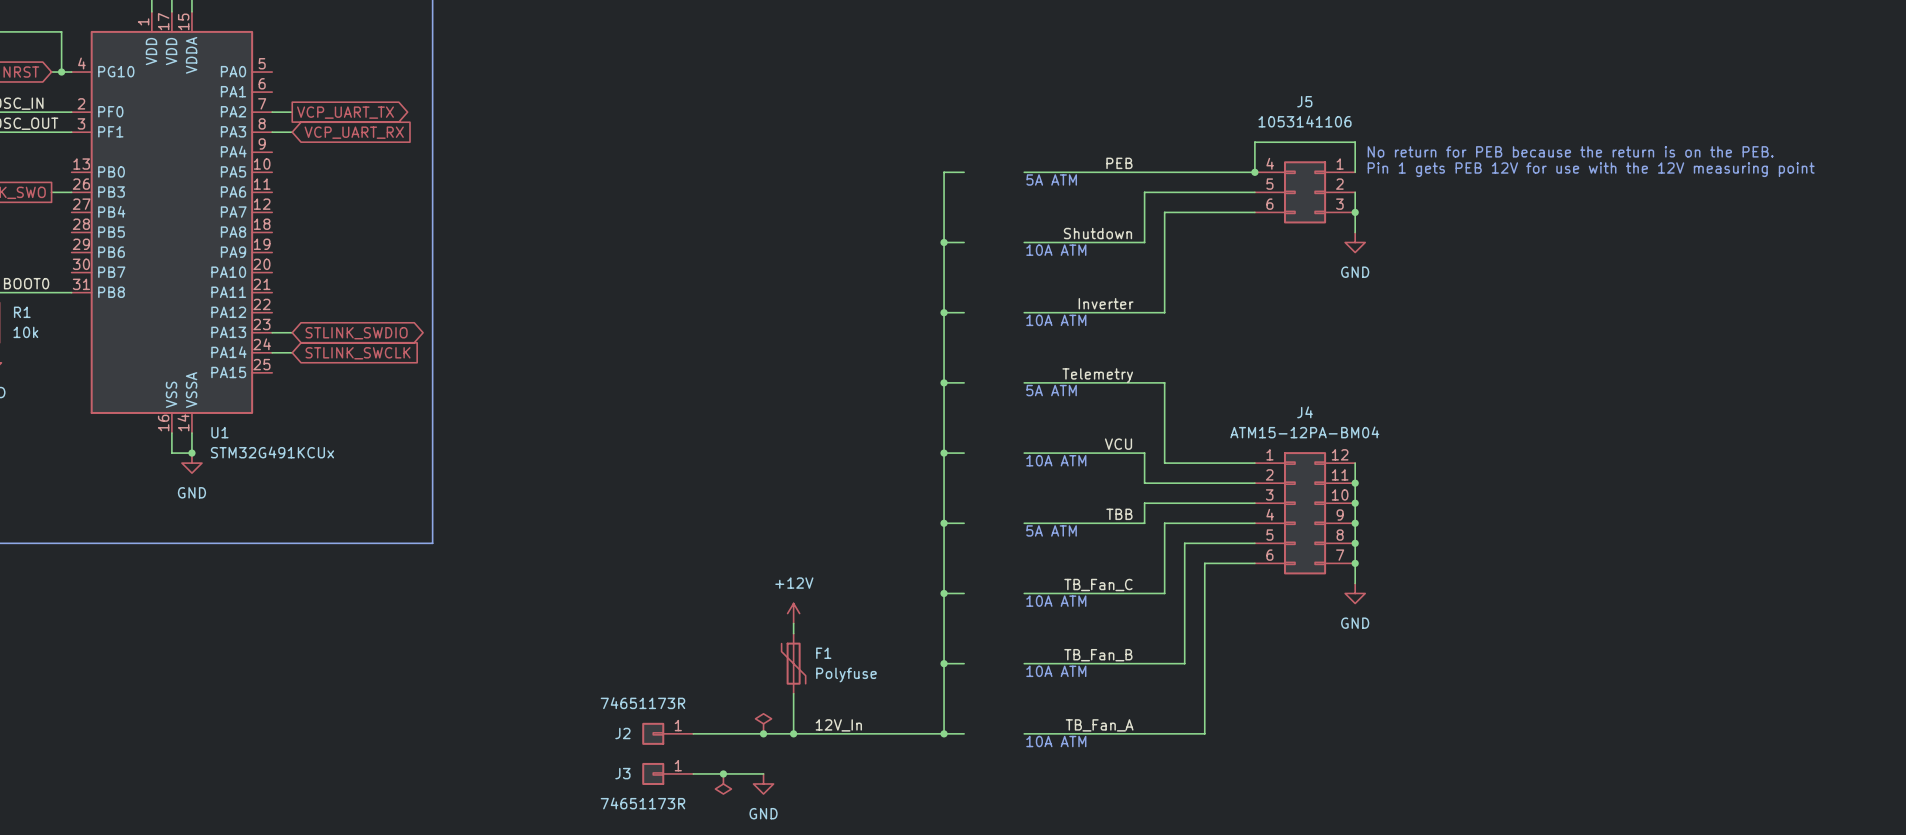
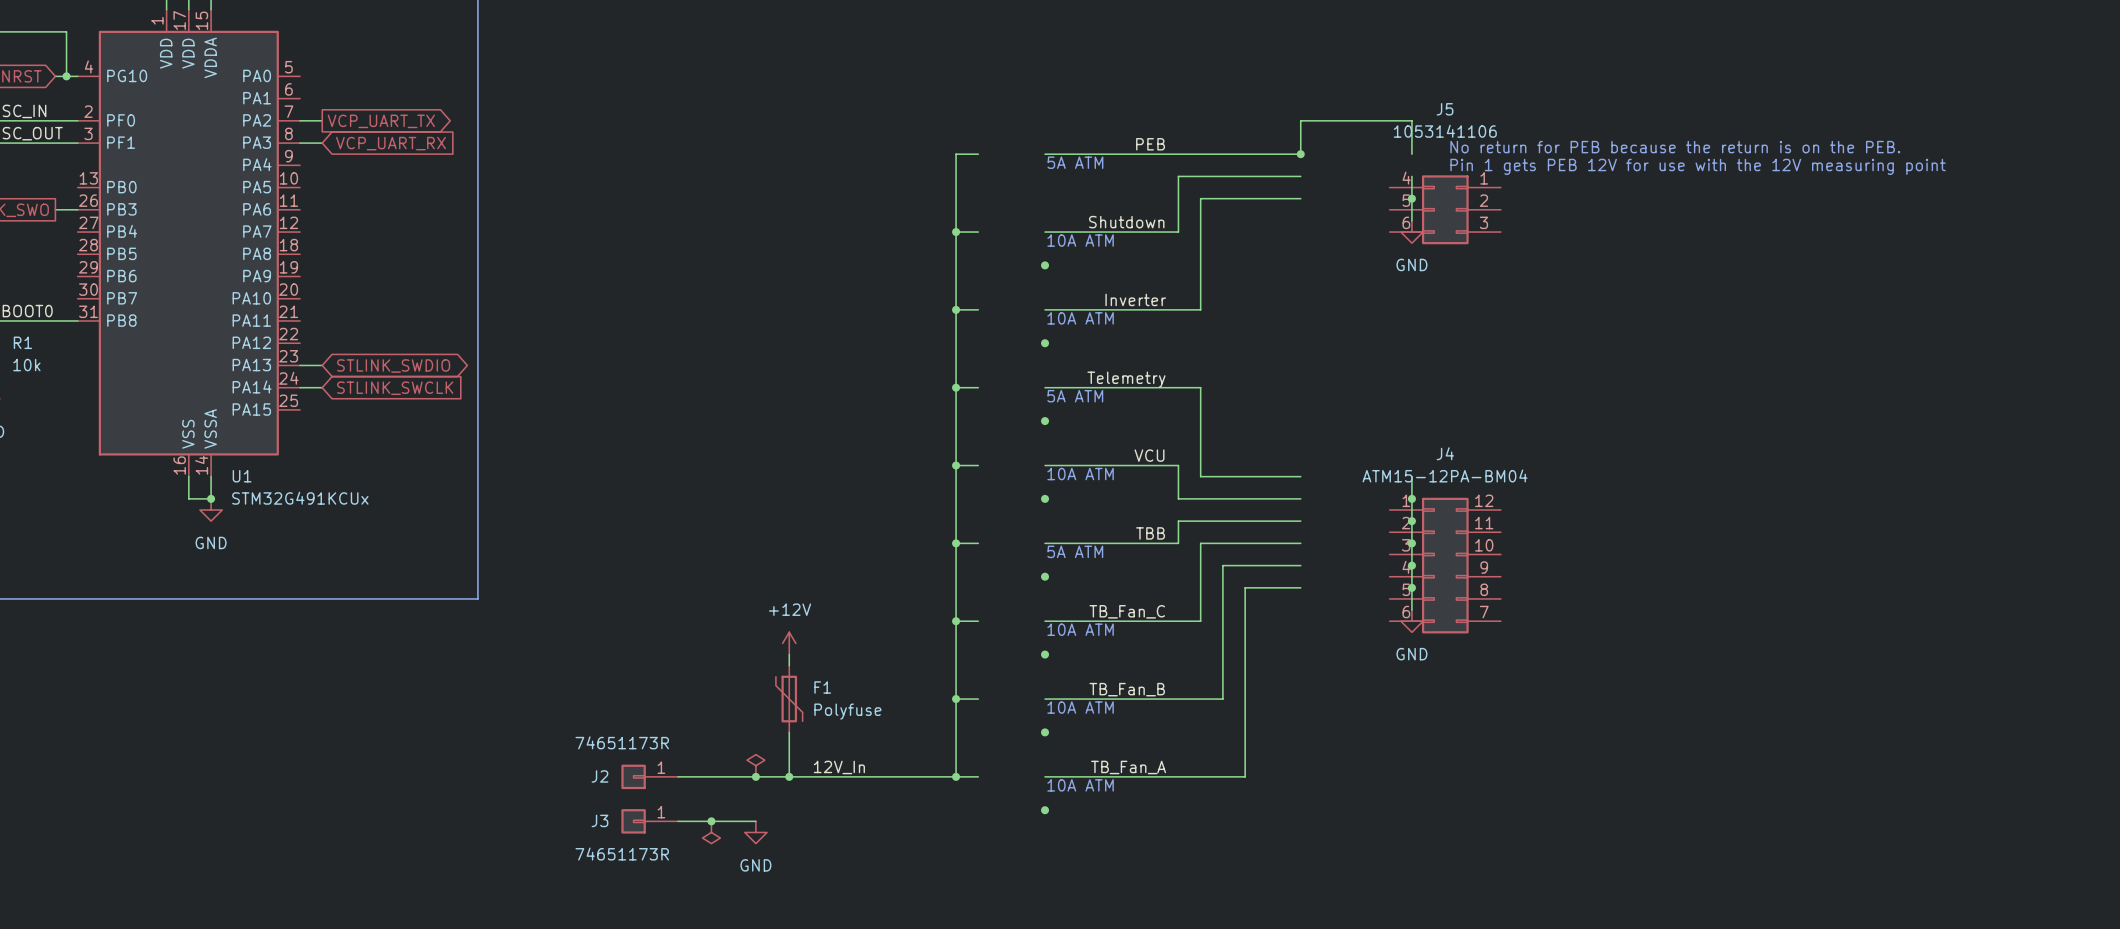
junction: none -> (1300, 154)
text position: No return for PEB because the return is on the PEB. (1570, 151) -> No return for PEB because the return is on the PEB. (1675, 147)
label position: PEB (1119, 163) -> PEB (1150, 144)
text position: Pin 1 gets PEB 12V for use with the 12V measuring point (1591, 169) -> Pin 1 gets PEB 12V for use with the 12V measuring point (1698, 166)
wire: (964, 172) (944, 172) (944, 733) -> (978, 154) (956, 154) (956, 776)
wire: (1024, 172) (1254, 172) (1254, 142) (1355, 142) (1355, 172) -> (1045, 154) (1300, 154) (1300, 120) (1411, 120) (1411, 154)
junction position: (1254, 172) -> (1411, 198)
text position: 5A ATM (1051, 179) -> 5A ATM (1075, 162)
wire: (1254, 192) (1144, 192) (1144, 242) (1024, 242) -> (1300, 176) (1178, 176) (1178, 232) (1045, 232)
wire: (1355, 192) (1355, 232) -> (1411, 176) (1411, 220)
junction: none -> (956, 232)
wire: (1254, 212) (1164, 212) (1164, 312) (1024, 312) -> (1300, 198) (1200, 198) (1200, 309) (1045, 309)
junction: (1355, 212) -> none
text: none -> 10A ATM (1080, 240)
label position: Shutdown (1097, 233) -> Shutdown (1126, 222)
wire: (944, 242) (964, 242) -> (956, 232) (978, 232)
power symbol position: GND (1355, 242) -> GND (1411, 232)
text: 10A ATM (1056, 250) -> none
junction: none -> (956, 309)
text: none -> 10A ATM (1080, 318)
label position: Inverter (1106, 303) -> Inverter (1135, 299)
wire: (944, 312) (964, 312) -> (956, 309) (978, 309)
text: 10A ATM (1056, 320) -> none
junction: none -> (956, 387)
text: none -> 5A ATM (1075, 396)
label position: Telemetry (1097, 375) -> Telemetry (1126, 379)
wire: (944, 382) (964, 382) -> (956, 387) (978, 387)
wire: (1024, 382) (1164, 382) (1164, 463) (1254, 463) -> (1045, 387) (1200, 387) (1200, 476) (1300, 476)
text: 5A ATM (1051, 390) -> none
junction: none -> (956, 465)
text: none -> 10A ATM (1080, 474)
label position: VCU (1118, 444) -> VCU (1149, 455)
wire: (944, 453) (964, 453) -> (956, 465) (978, 465)
wire: (1024, 453) (1064, 453) -> (1045, 465) (1178, 465) (1178, 498)
wire: (1144, 453) (1144, 483) (1254, 483) -> (1267, 498) (1300, 498)
junction: none -> (1411, 498)
text: 10A ATM (1056, 460) -> none
wire: (1355, 463) (1355, 583) -> (1411, 476) (1411, 610)
junction: none -> (1411, 521)
junction: (1355, 483) -> none
junction: none -> (956, 543)
junction: none -> (1411, 543)
text: none -> 5A ATM (1075, 551)
wire: (1254, 503) (1144, 503) (1144, 523) (1024, 523) -> (1300, 521) (1178, 521) (1178, 543) (1045, 543)
junction: (1355, 503) -> none
junction: none -> (1411, 565)
label position: TBB (1119, 514) -> TBB (1150, 533)
wire: (944, 523) (964, 523) -> (956, 543) (978, 543)
wire: (1254, 523) (1164, 523) (1164, 593) (1024, 593) -> (1300, 543) (1200, 543) (1200, 621) (1045, 621)
junction: (1355, 523) -> none
text: 5A ATM (1051, 530) -> none
junction: none -> (1411, 587)
wire: (1254, 543) (1184, 543) (1184, 663) (1024, 663) -> (1300, 565) (1222, 565) (1222, 699) (1045, 699)
junction: (1355, 543) -> none
junction: none -> (956, 621)
wire: (1254, 563) (1204, 563) (1204, 733) (1024, 733) -> (1300, 587) (1245, 587) (1245, 776) (1045, 776)
junction: (1355, 563) -> none
text: none -> 10A ATM (1080, 629)
label position: TB_Fan_C (1098, 585) -> TB_Fan_C (1127, 611)
wire: (944, 593) (964, 593) -> (956, 621) (978, 621)
power symbol position: GND (1355, 593) -> GND (1411, 621)
text: 10A ATM (1056, 601) -> none
power symbol position: +12V (793, 613) -> +12V (789, 643)
wire: (793, 623) (793, 633) -> (789, 654) (789, 665)
junction: none -> (956, 699)
text: none -> 10A ATM (1080, 707)
label position: TB_Fan_B (1098, 655) -> TB_Fan_B (1127, 689)
F1 position: (793, 663) -> (789, 699)
wire: (944, 663) (964, 663) -> (956, 699) (978, 699)
text: 10A ATM (1056, 671) -> none
power symbol: none -> (755, 765)
wire: (793, 693) (793, 733) -> (789, 732) (789, 776)
junction: none -> (755, 776)
junction: none -> (789, 776)
junction: none -> (956, 776)
text: none -> 10A ATM (1080, 785)
power symbol: (763, 723) -> none
label position: 12V_In (838, 725) -> 12V_In (839, 767)
label position: TB_Fan_A (1099, 725) -> TB_Fan_A (1128, 767)
J2 position: (667, 733) -> (649, 776)
wire: (693, 733) (964, 733) -> (678, 776) (978, 776)
junction: (763, 733) -> none
junction: (793, 733) -> none
text: 10A ATM (1056, 741) -> none
junction: none -> (711, 821)
power symbol: none -> (711, 832)
J3 position: (667, 773) -> (649, 821)
wire: (693, 773) (763, 773) -> (678, 821) (755, 821)
junction: (723, 773) -> none
power symbol: (723, 783) -> none
power symbol position: GND (763, 783) -> GND (755, 832)

